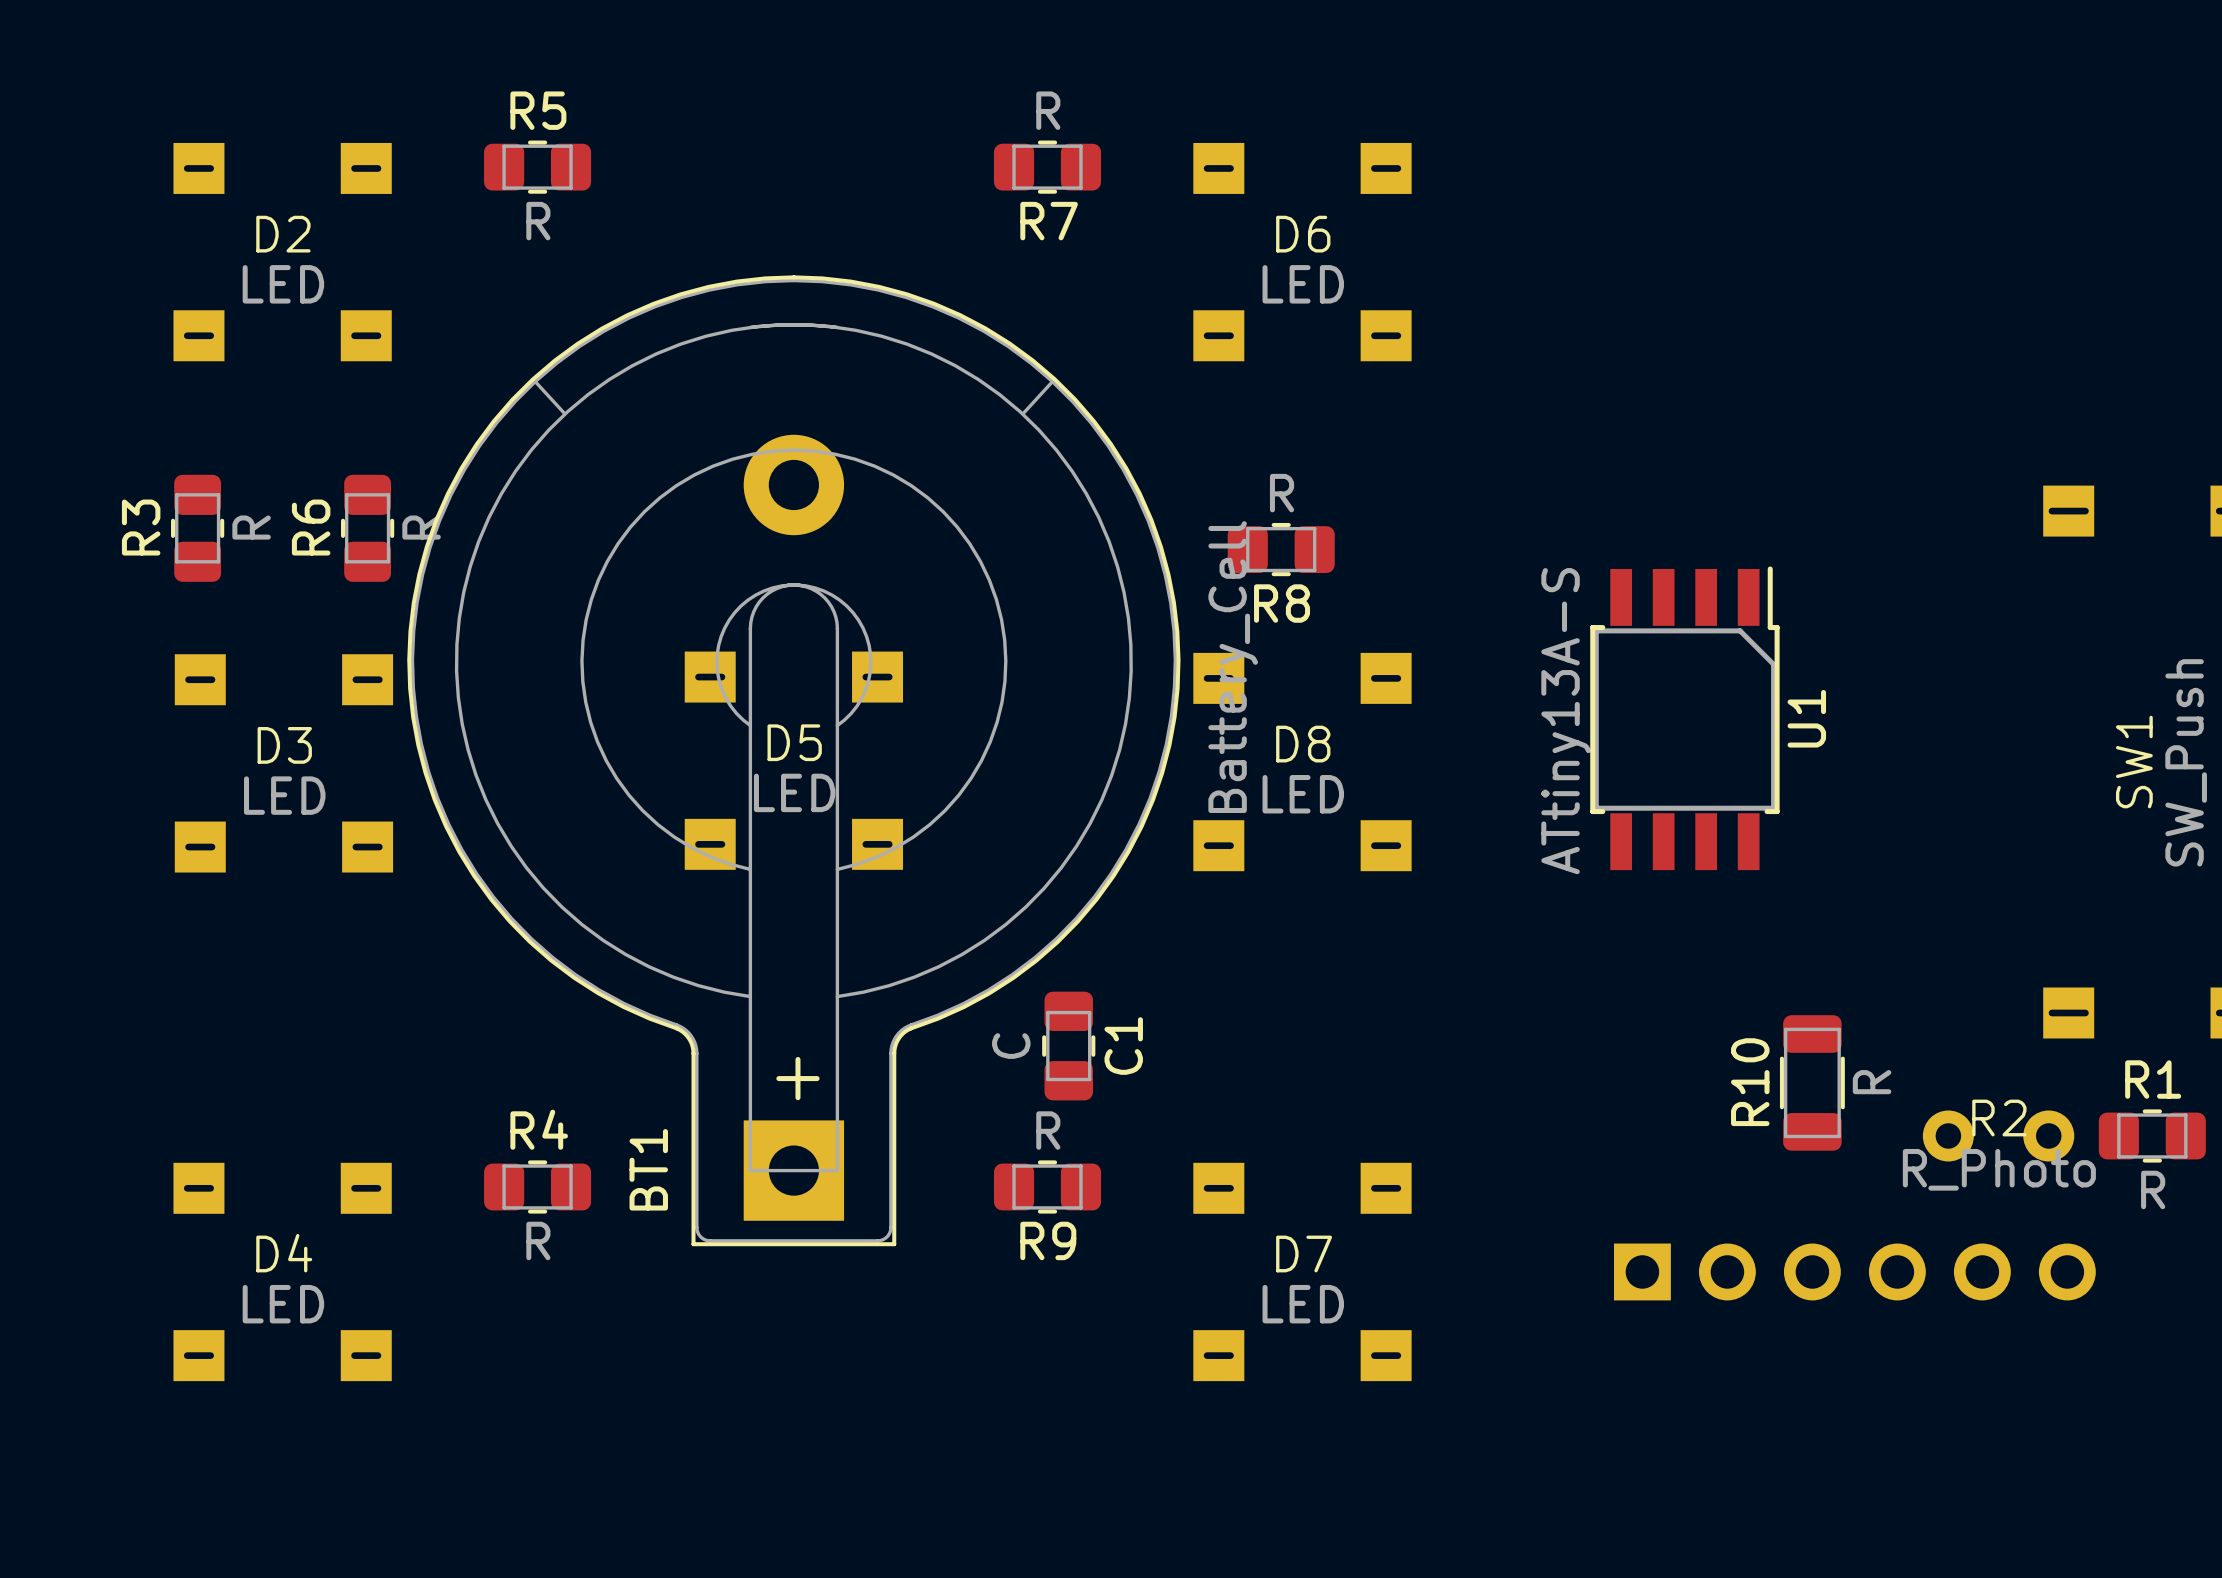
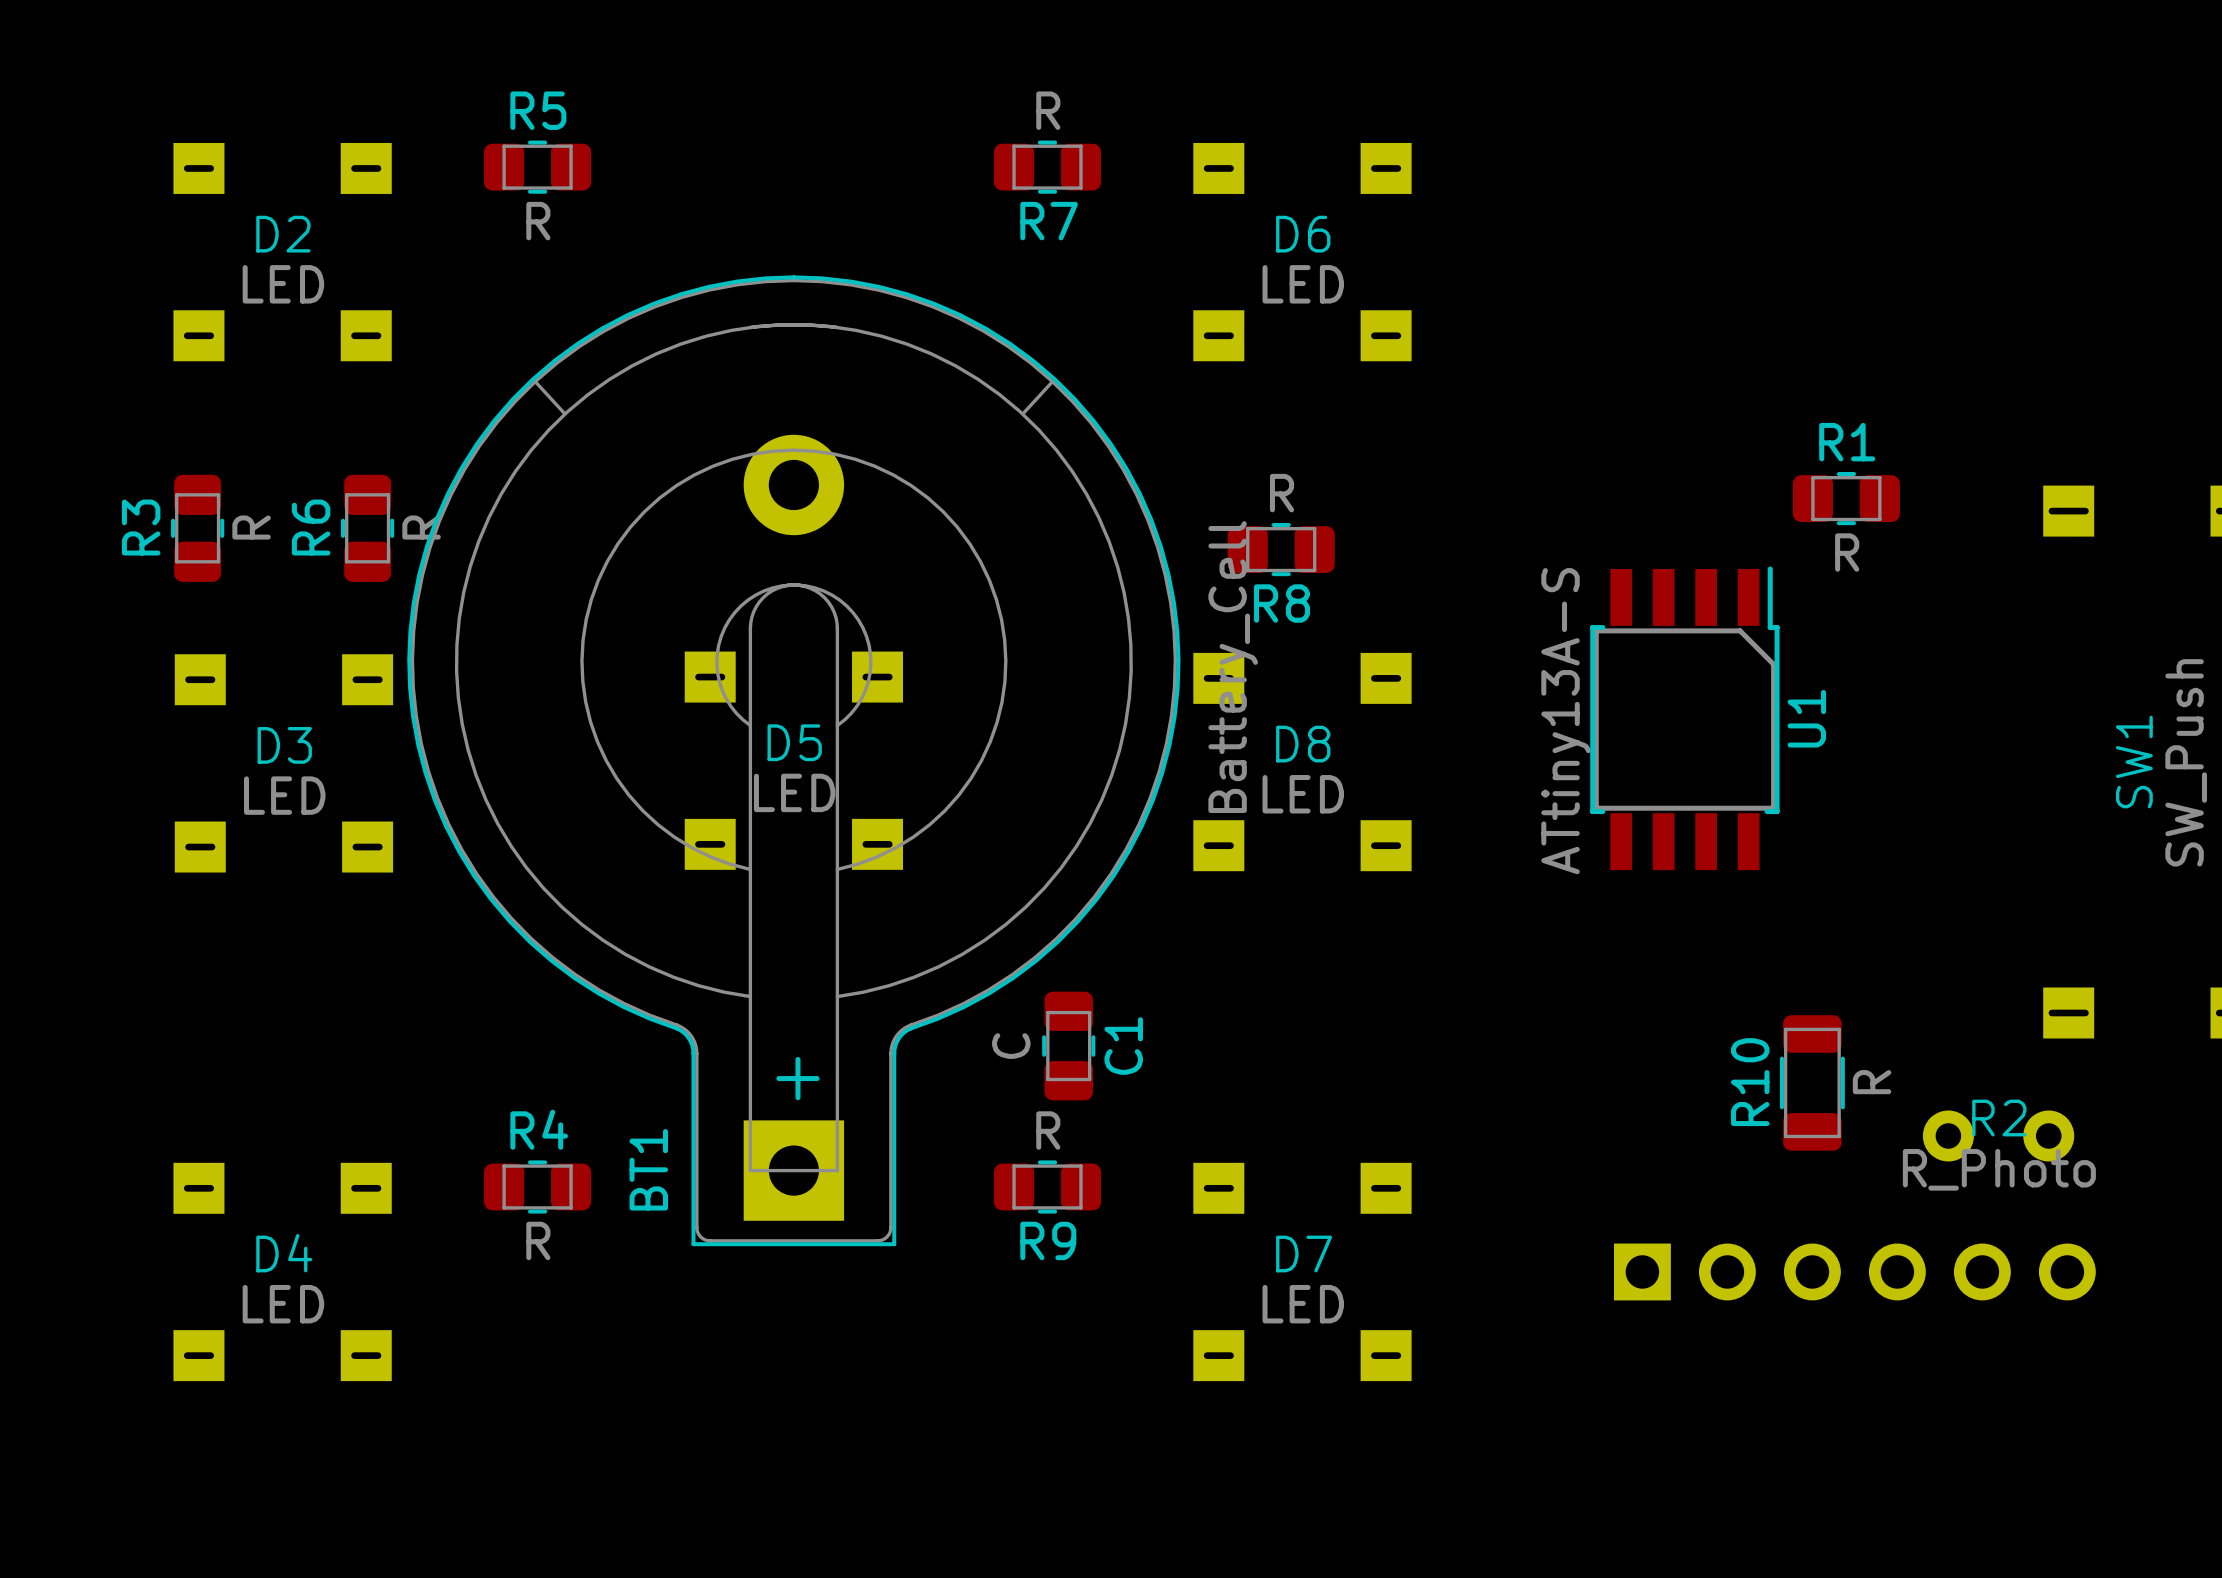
R1 position: (2152, 1135) -> (1846, 498)

